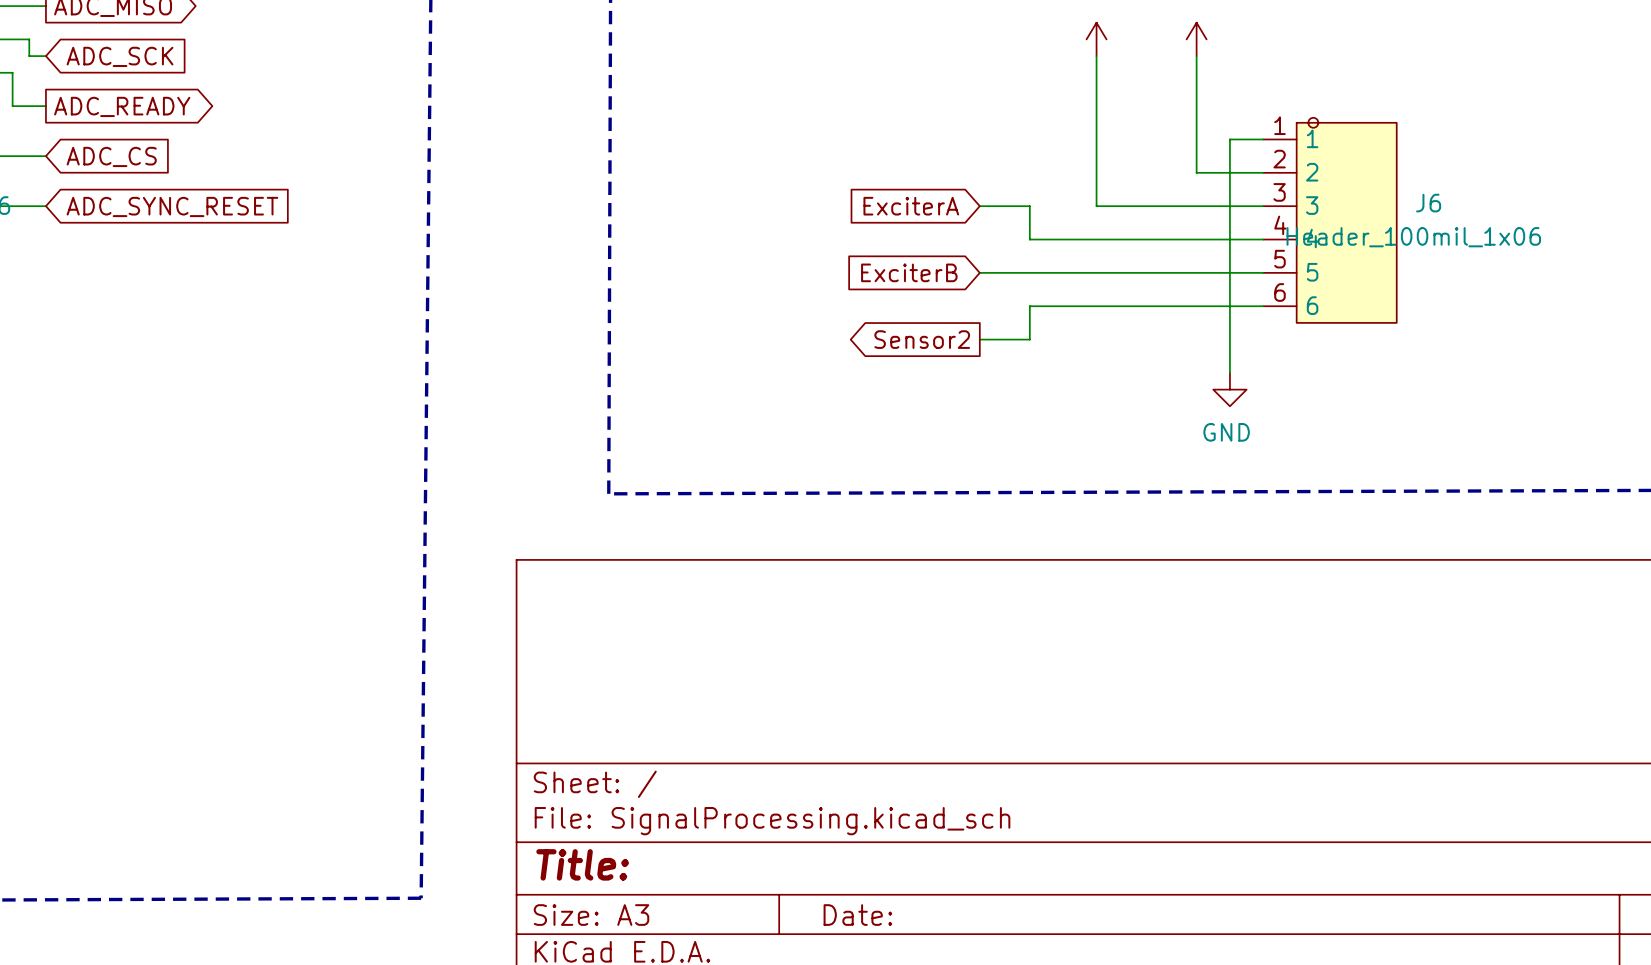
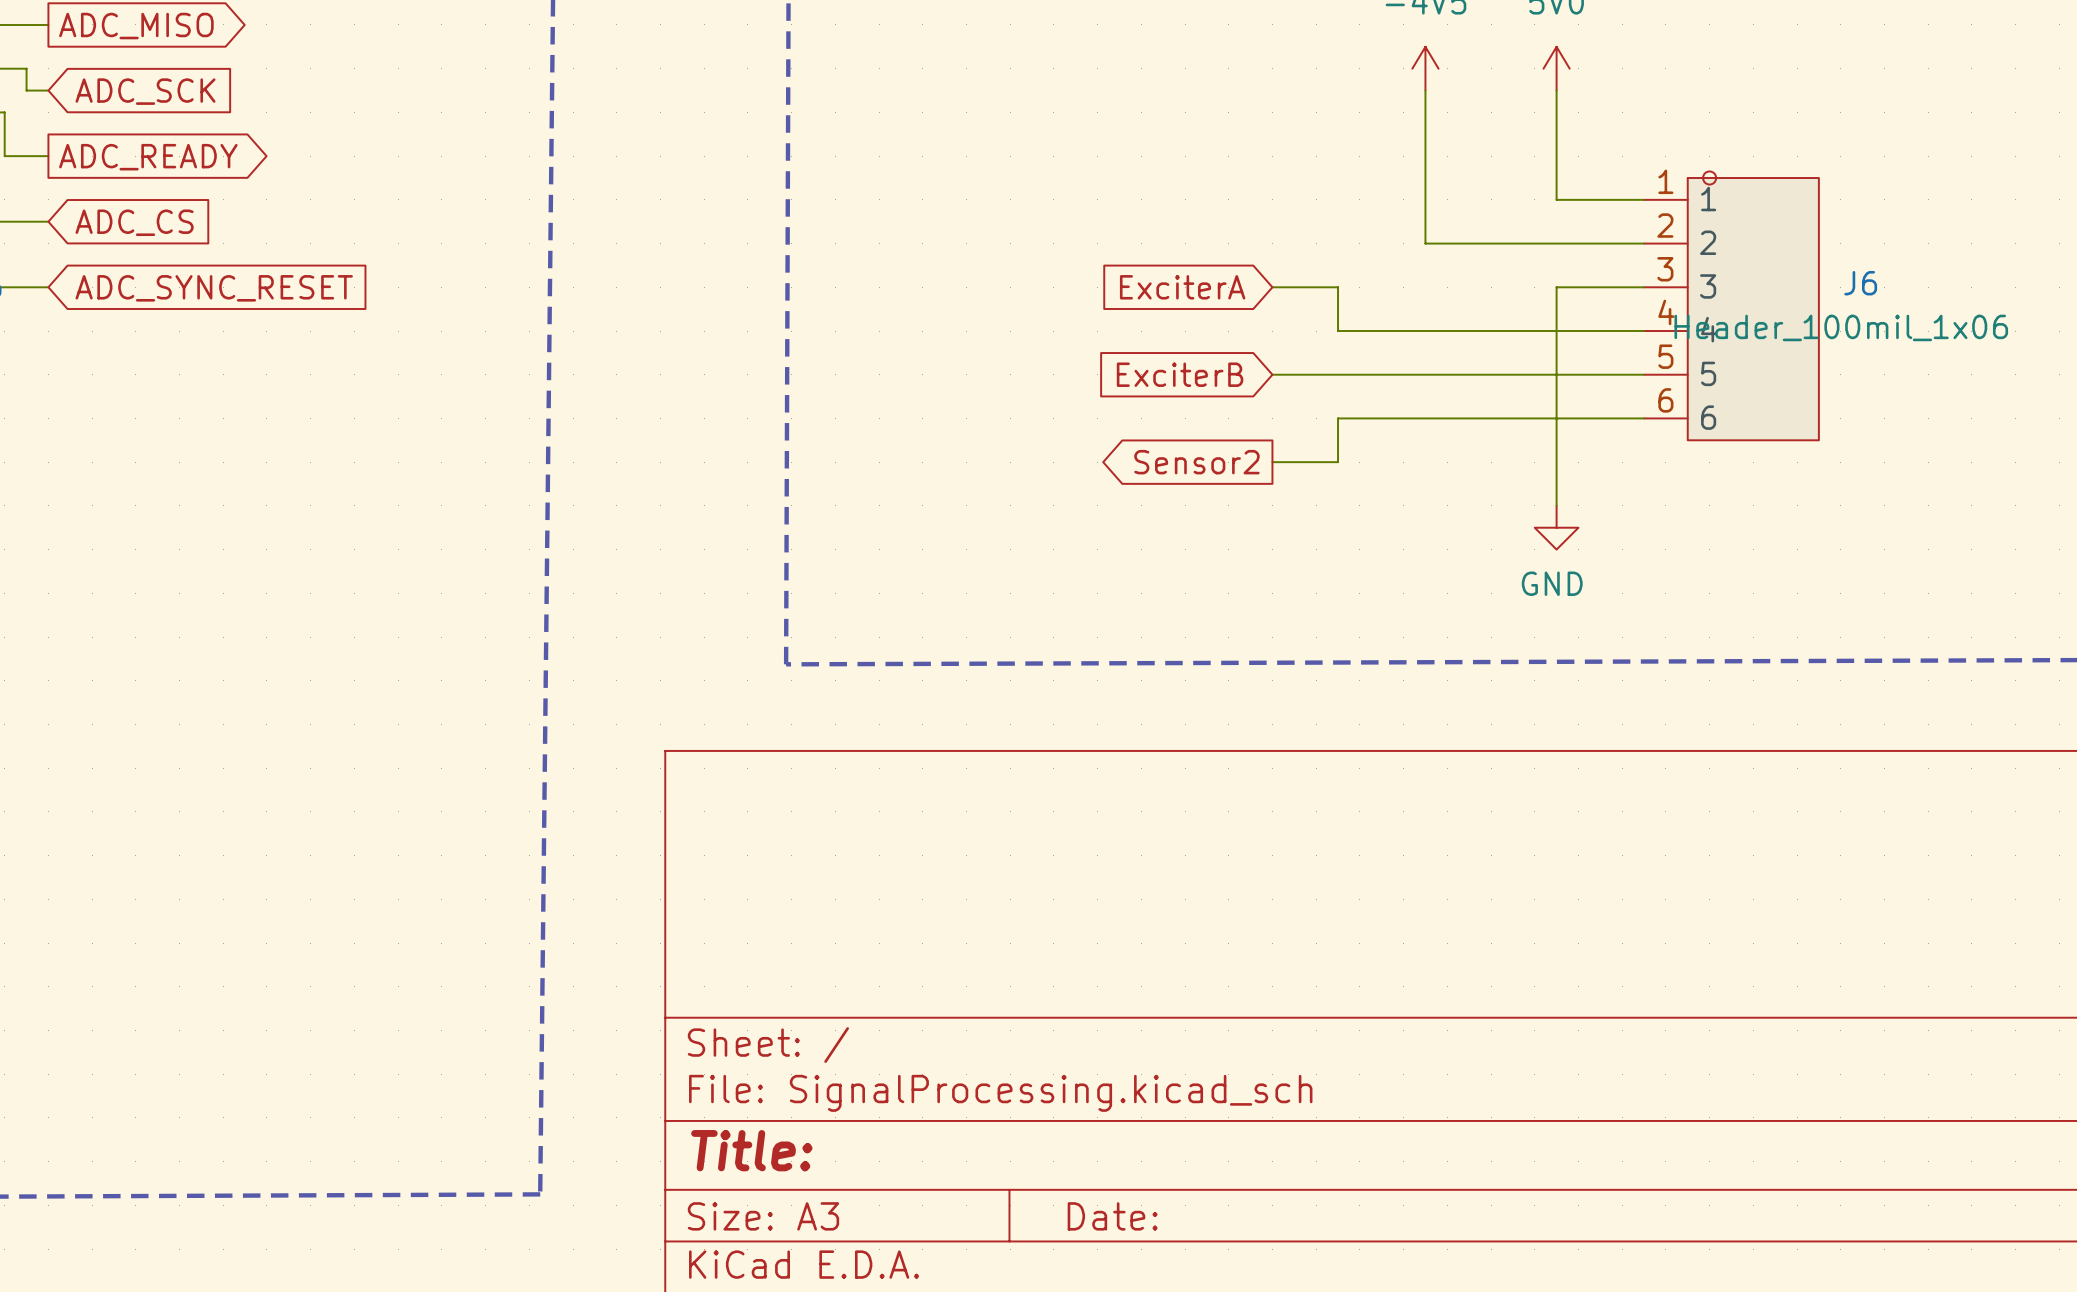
wire: (1196, 139) (1196, 172) -> (1556, 199) (1600, 199)
wire: (1229, 139) (1229, 372) -> none
wire: (1096, 172) (1096, 206) (1196, 206) -> (1425, 243) (1556, 243)
wire: none -> (1556, 287) (1556, 505)
power symbol position: GND (1229, 389) -> GND (1556, 527)

